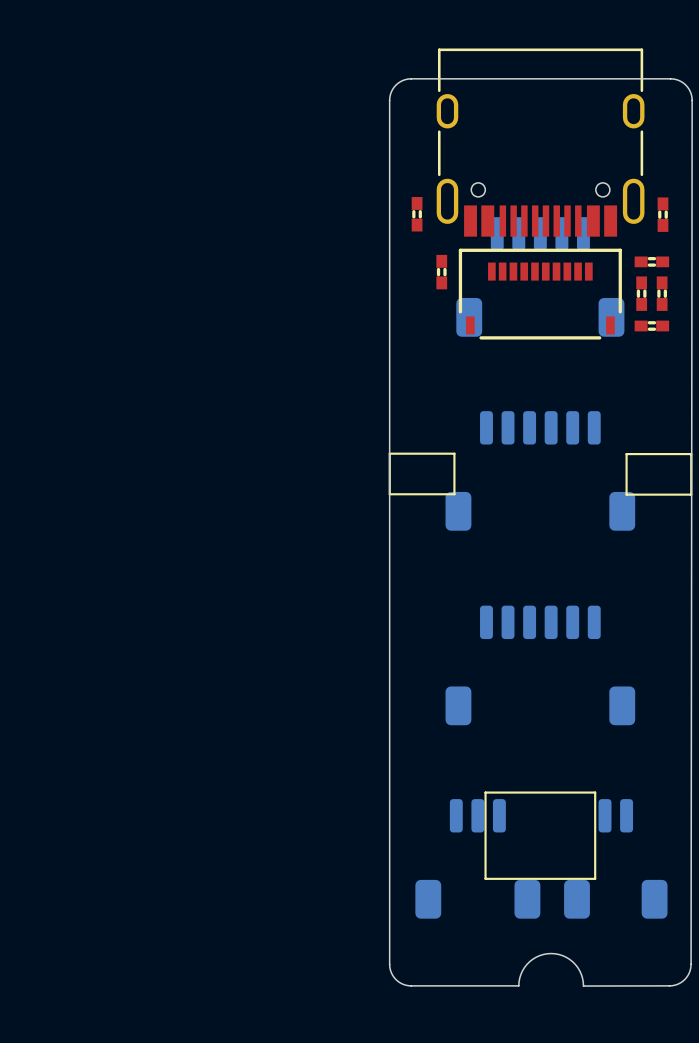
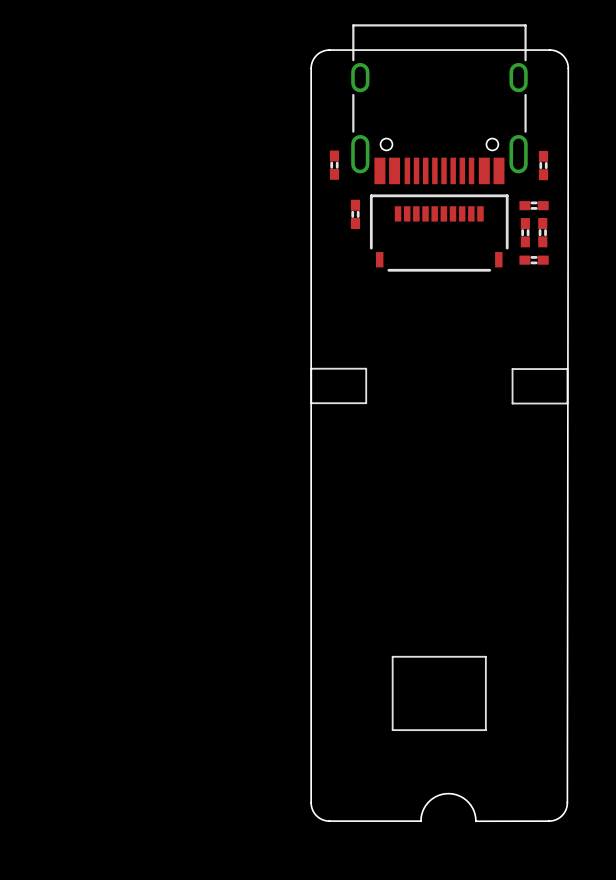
part: (540, 276) -> none
part: (540, 470) -> none
part: (540, 665) -> none
part: (477, 858) -> none
part: (615, 858) -> none

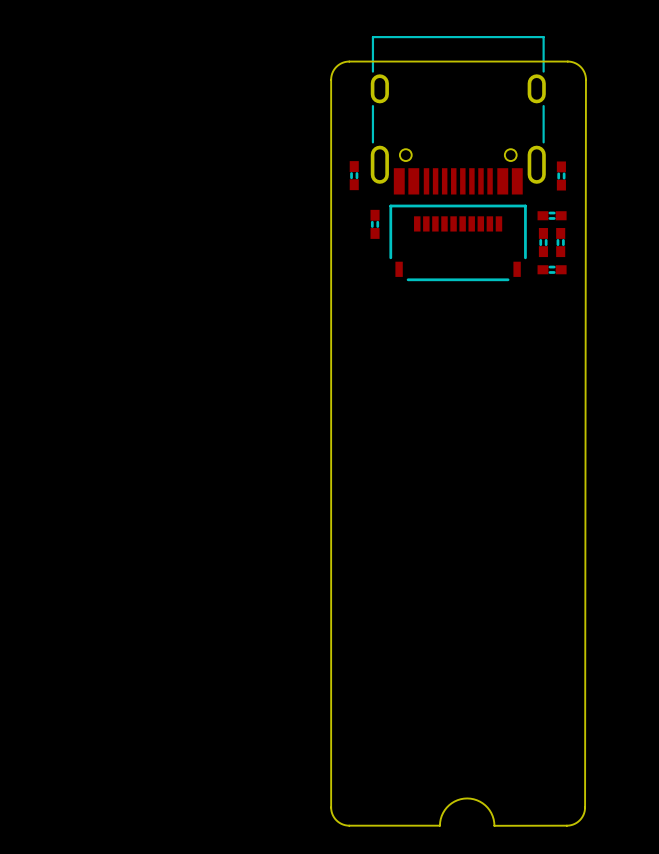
line: (311, 368) (366, 368) (366, 403) (311, 403) (311, 368) -> none
line: (512, 369) (567, 369) (567, 403) (512, 403) (512, 369) -> none
line: (392, 656) (485, 656) (485, 730) (392, 730) (392, 656) -> none

